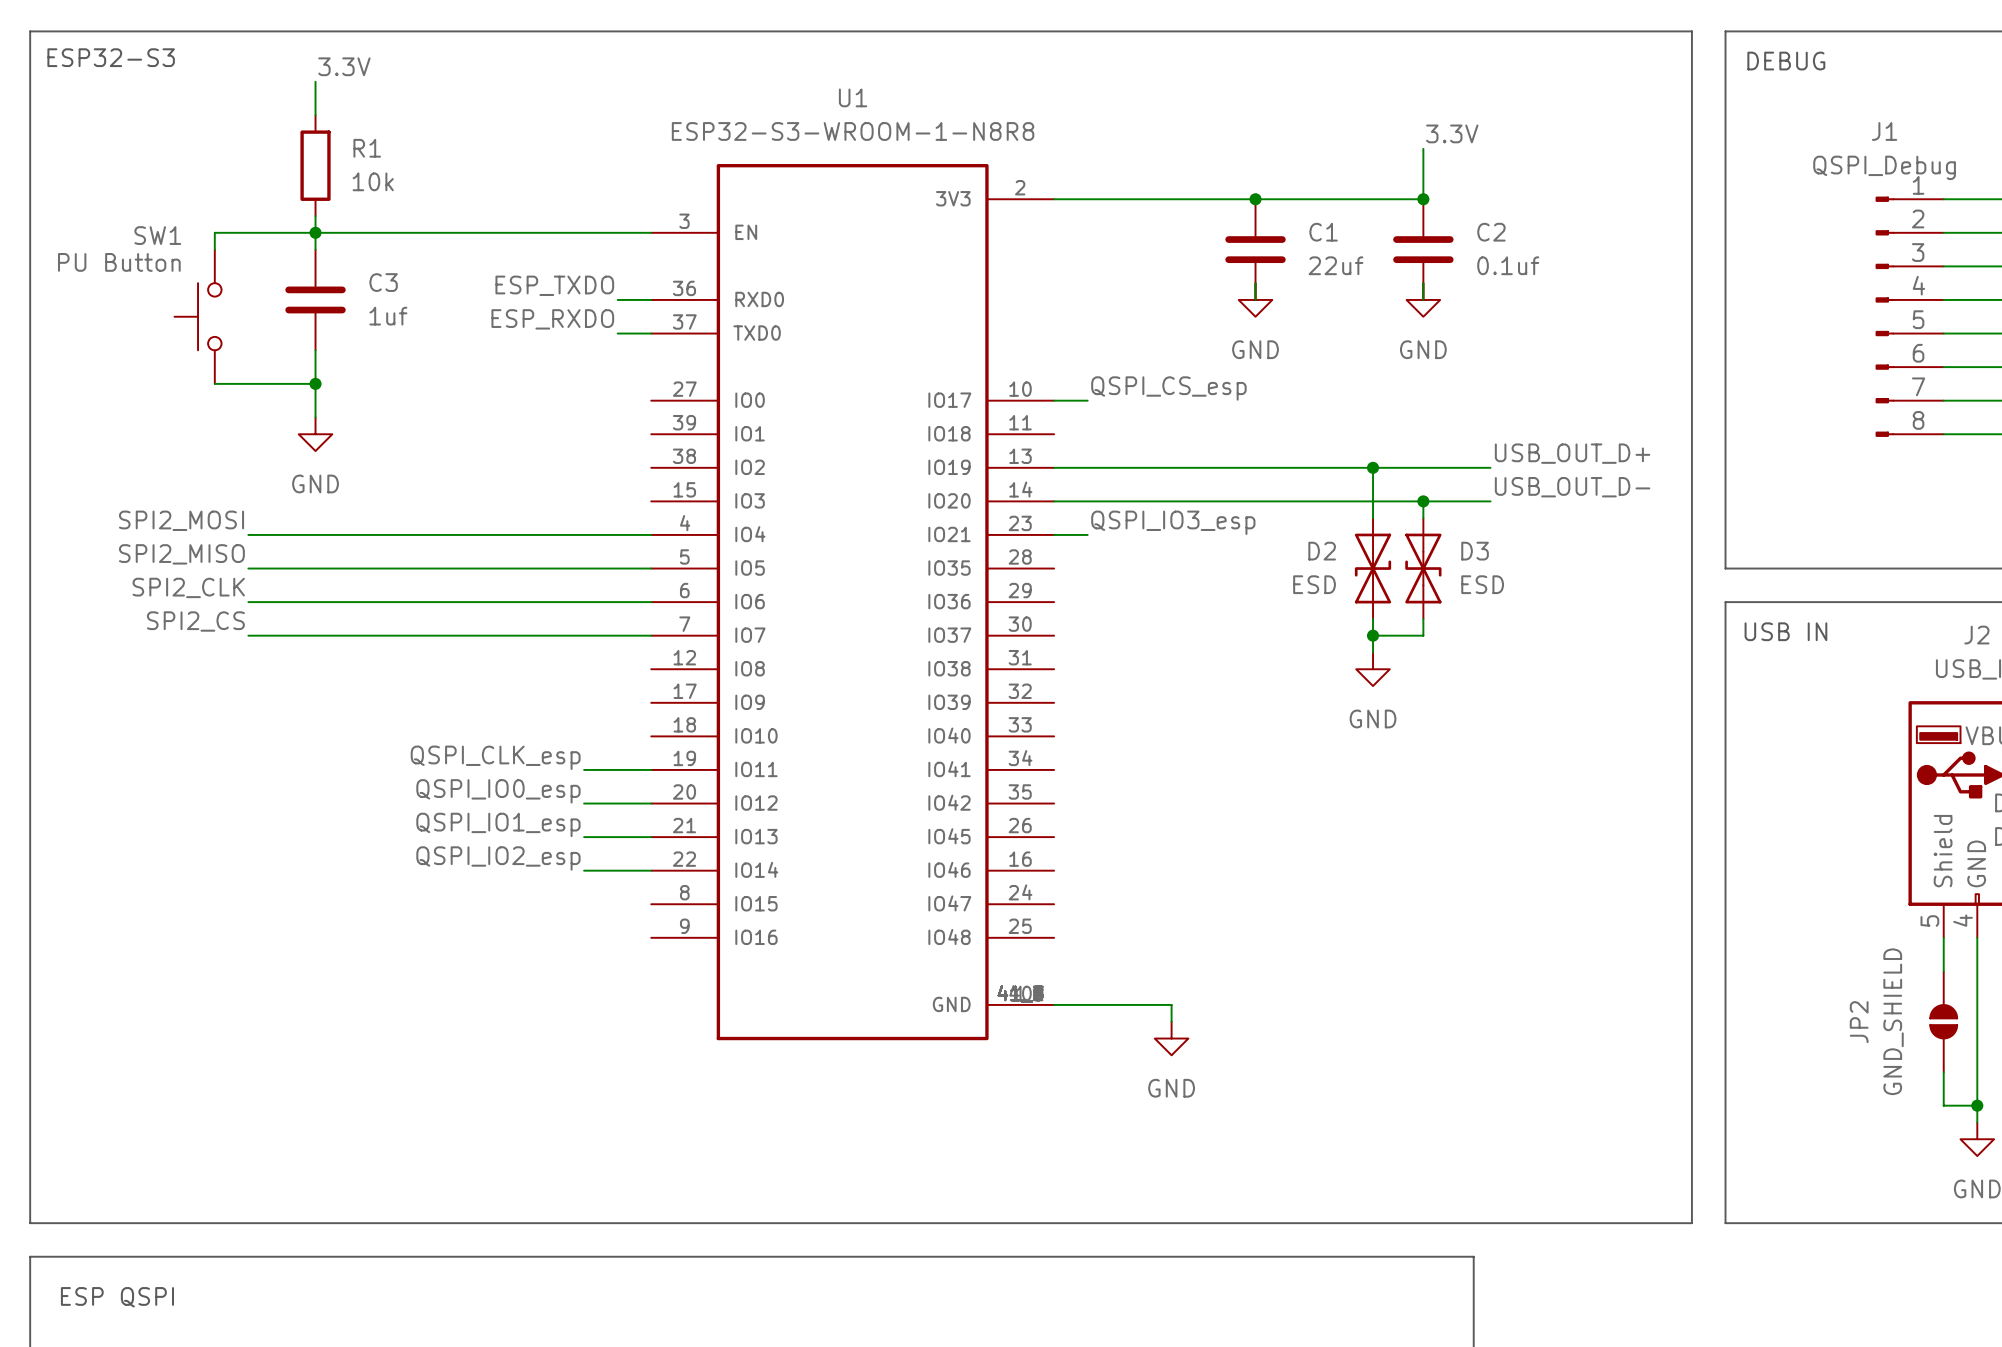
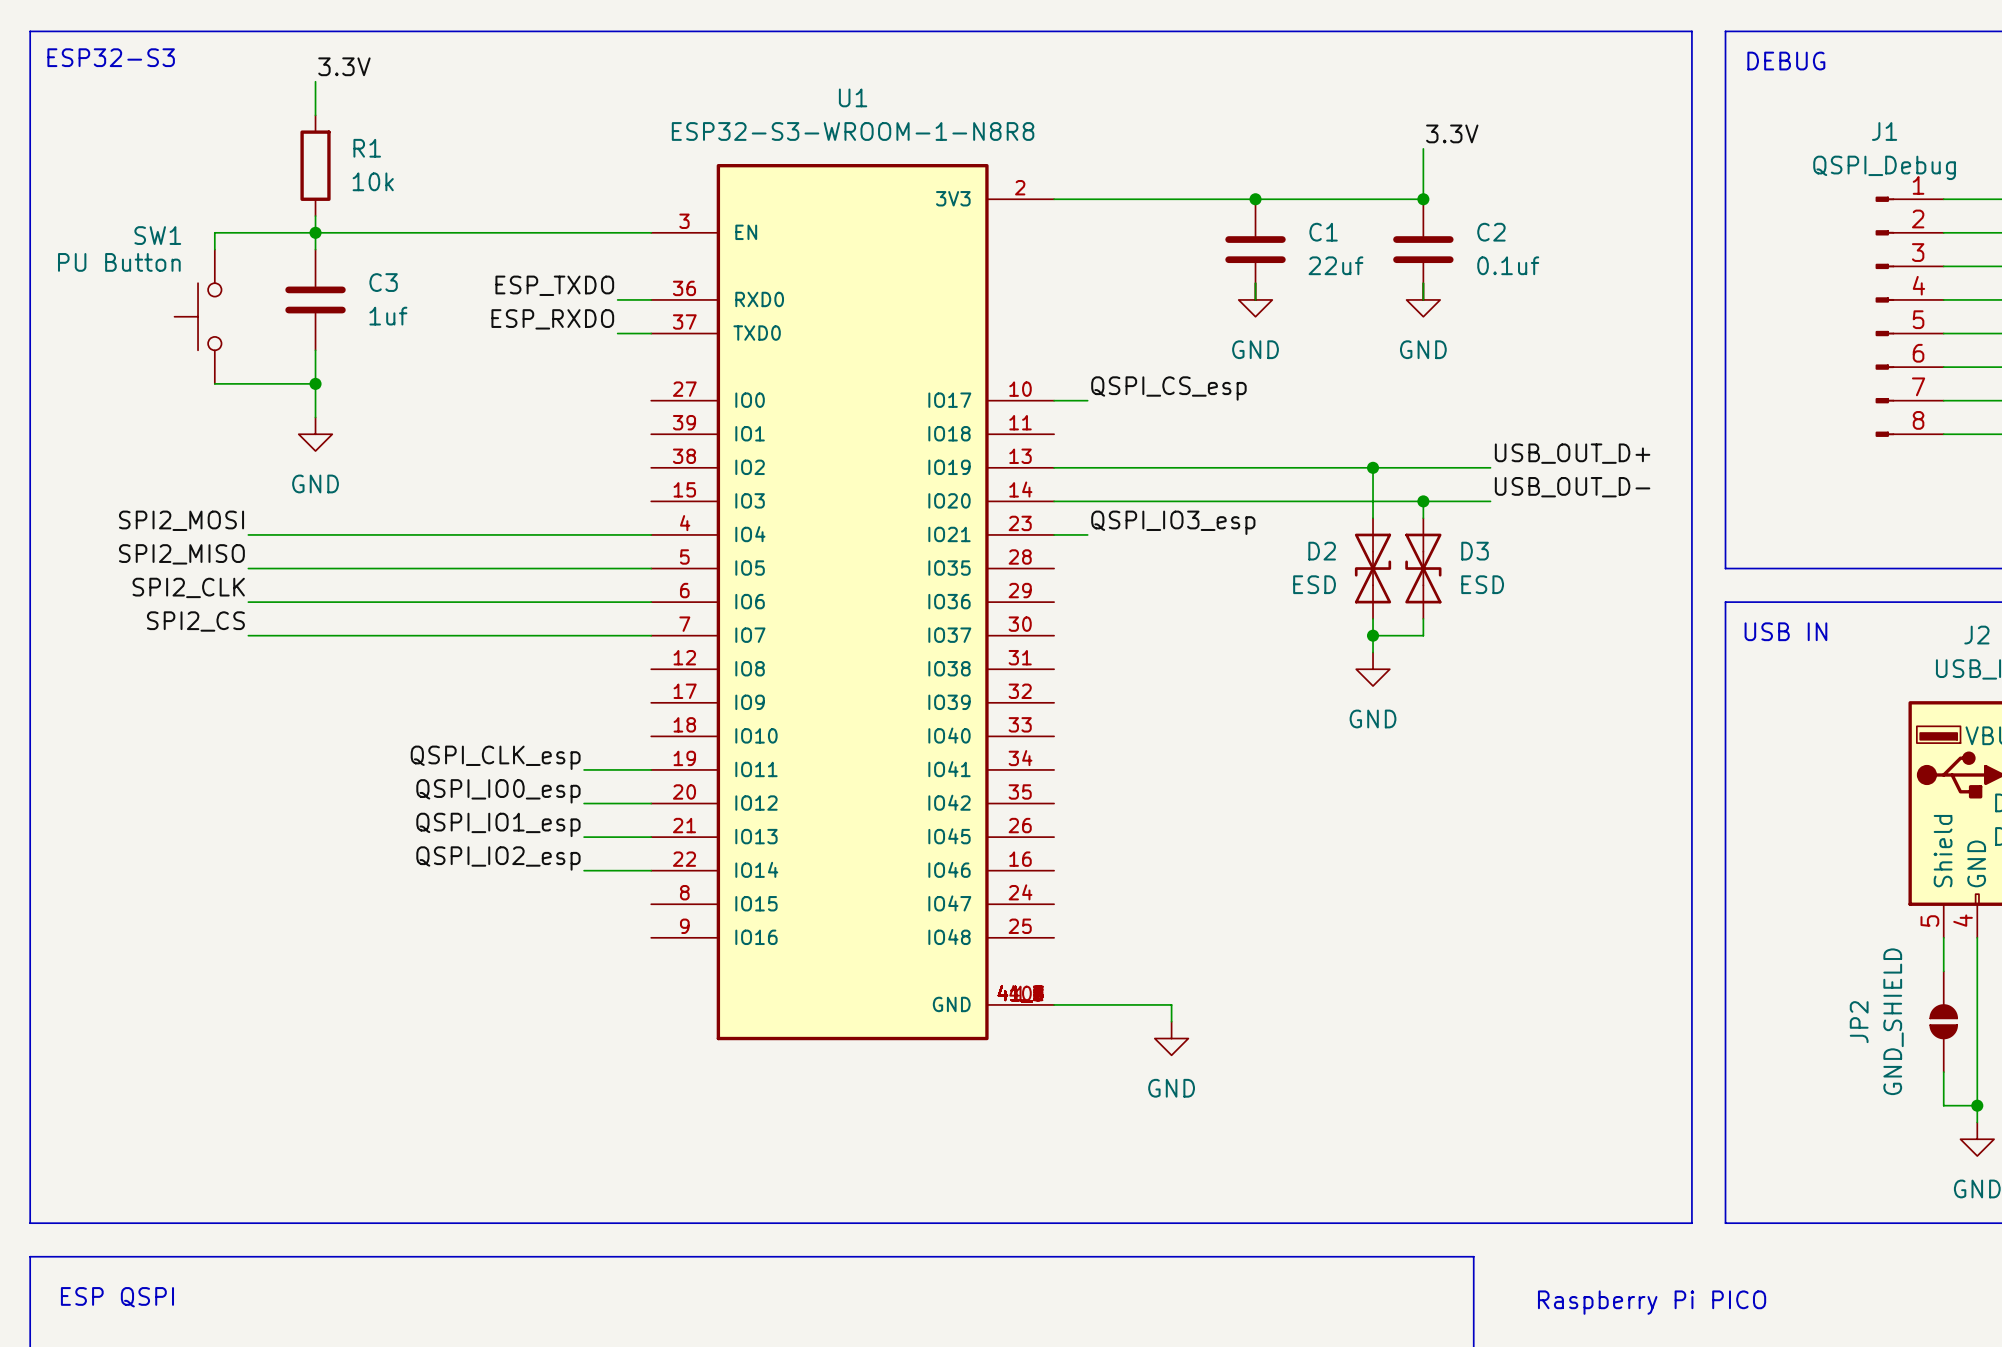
text: none -> Raspberry Pi PICO (1652, 1302)

